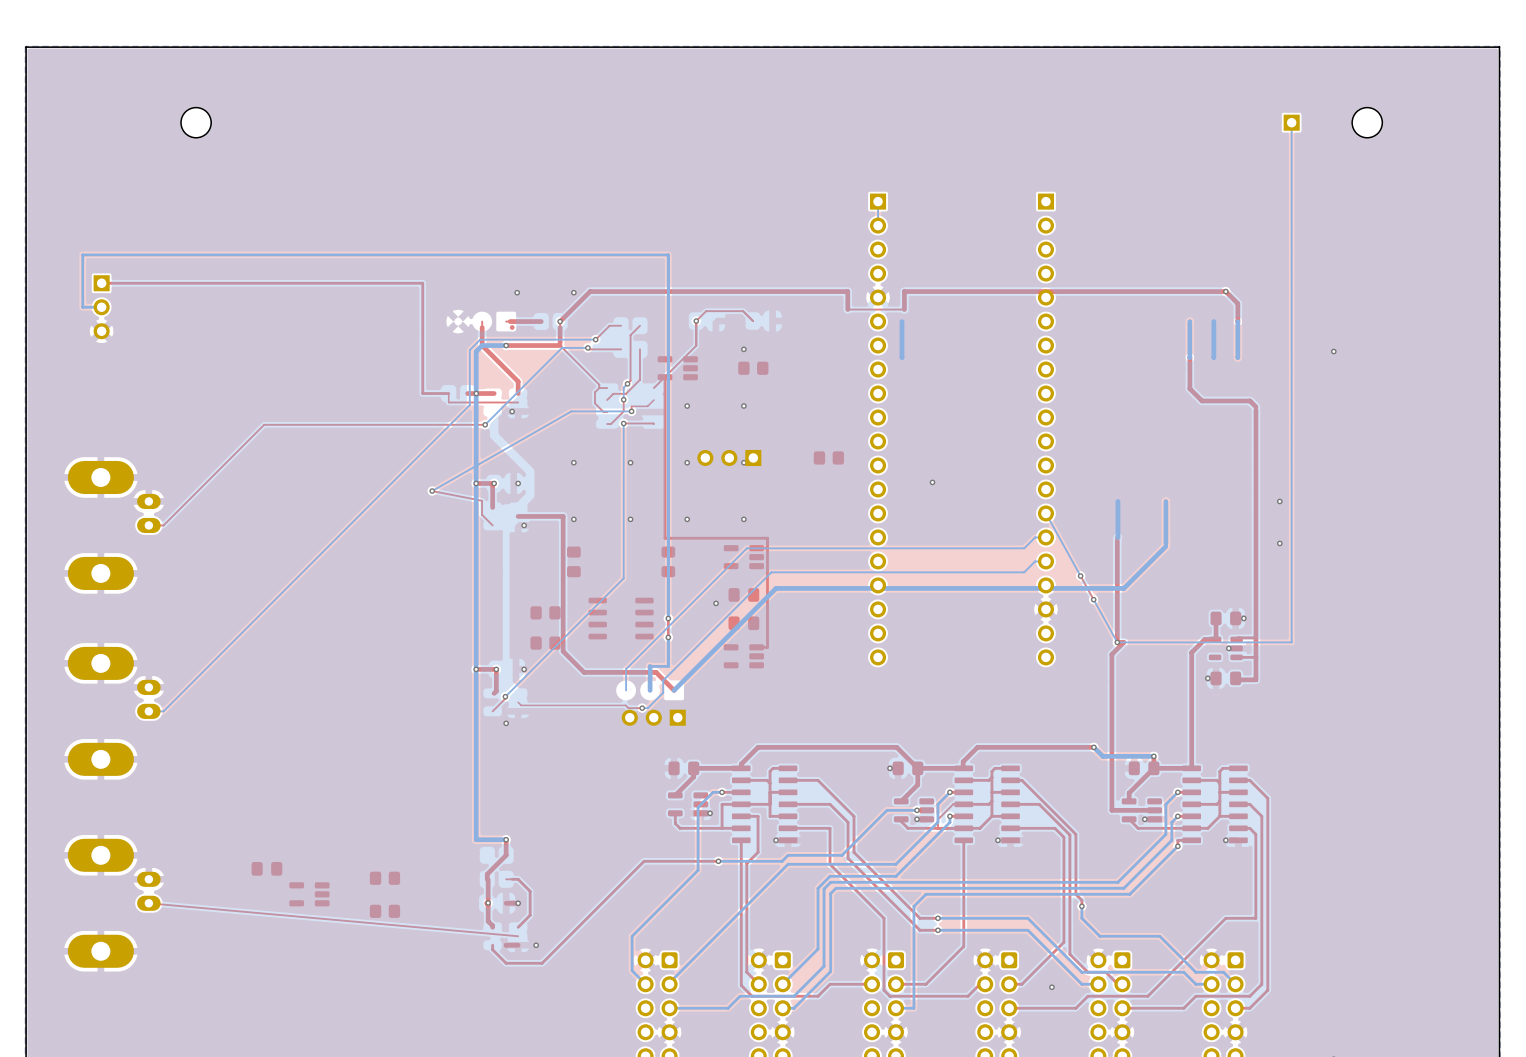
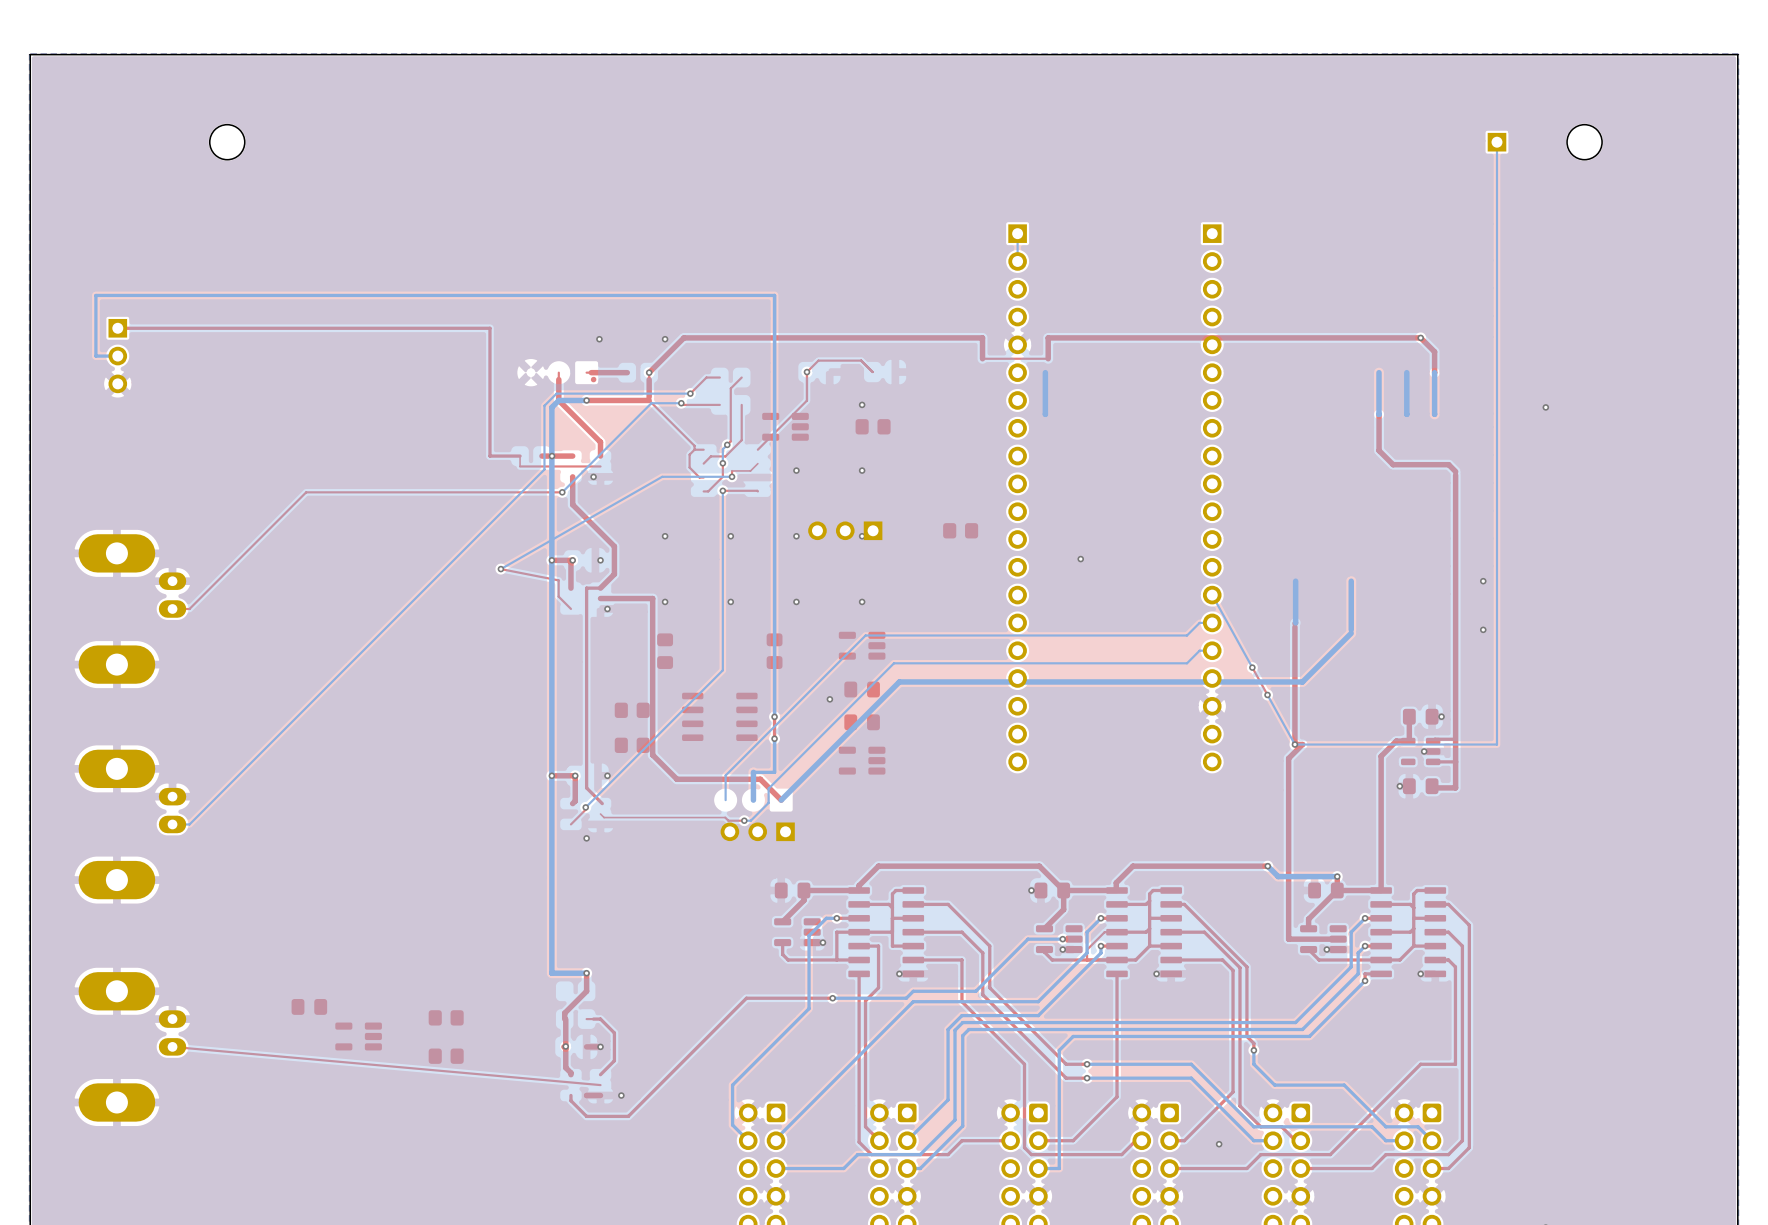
top track: (665, 377) (665, 538) (767, 538) (767, 647) (756, 647) -> none
top track: none -> (570, 476) (572, 476) (572, 504) (614, 546) (614, 574) (600, 588) (586, 588) (586, 787) (602, 803)

